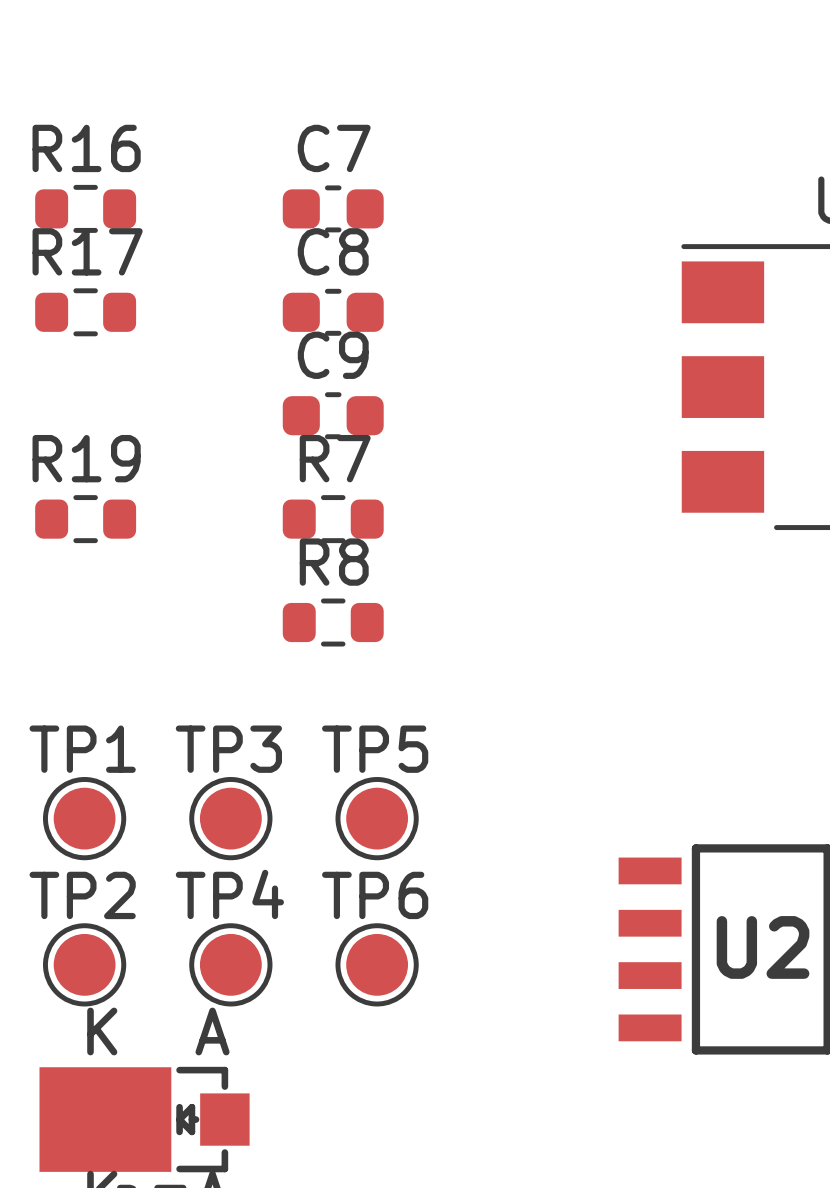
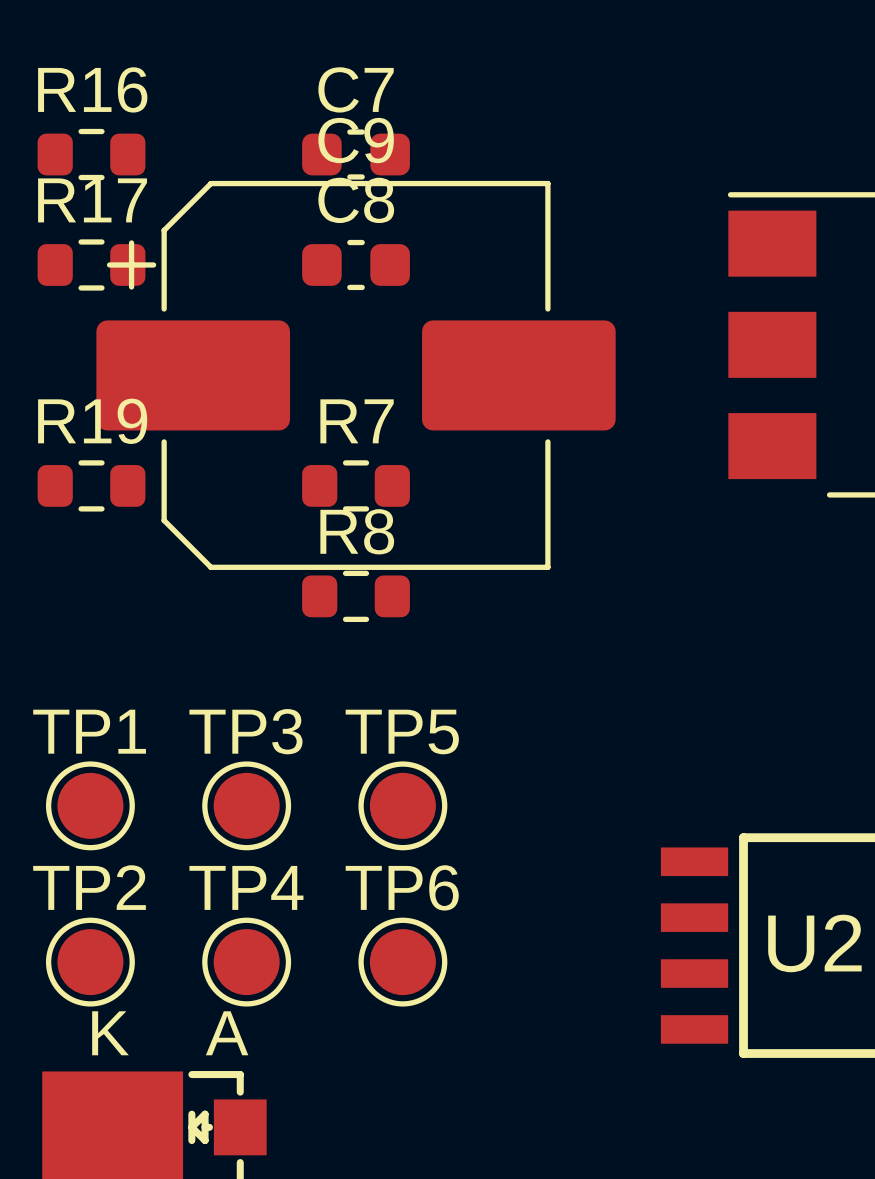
C9 name position: C9 (333, 355) -> C9 (356, 140)
C9 footprint: [282, 392, 384, 440] -> [96, 180, 616, 570]

